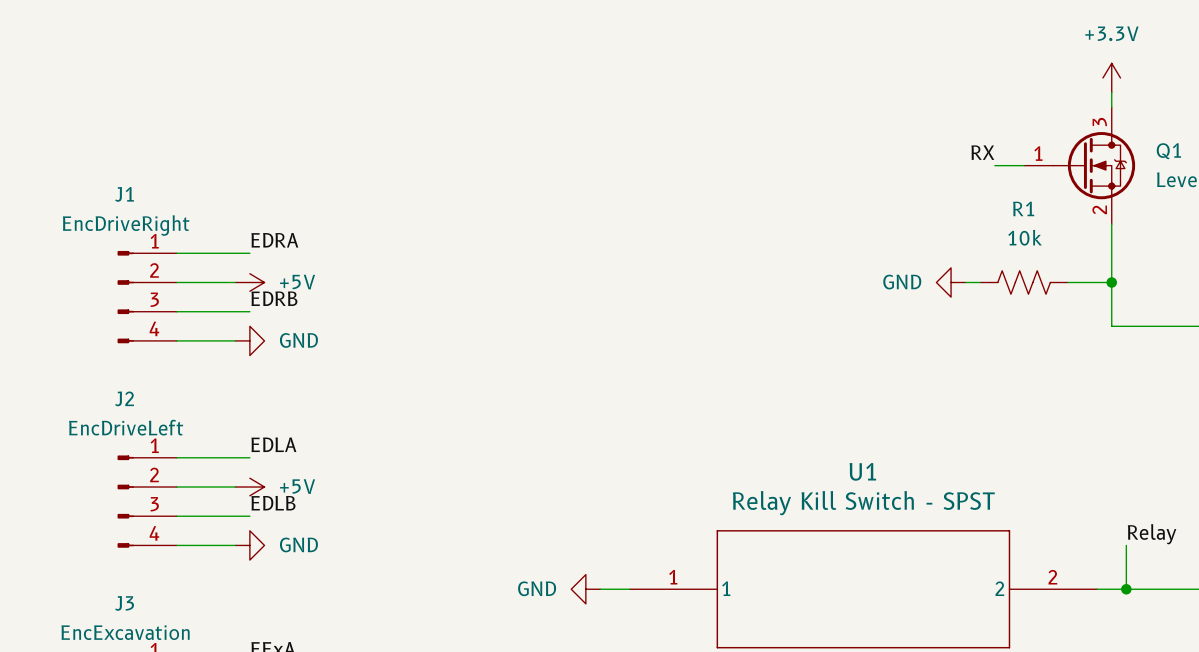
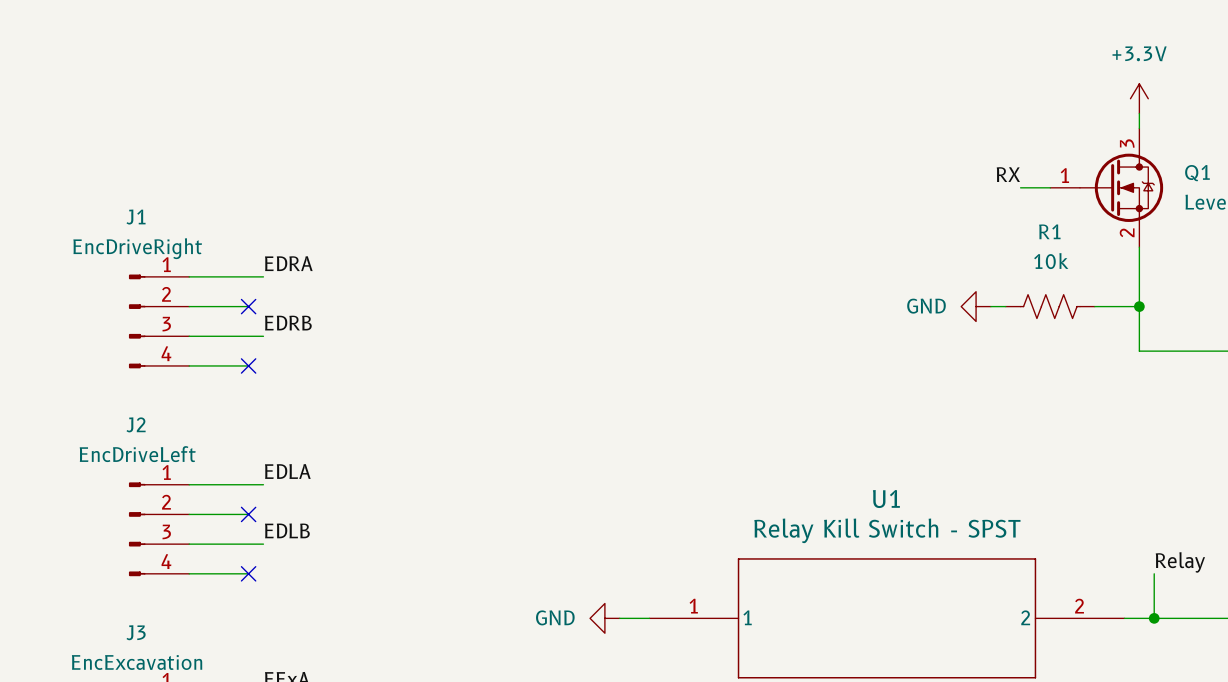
no-connect mark: none -> (248, 306)
power symbol: +5V (249, 282) -> none
no-connect mark: none -> (248, 365)
power symbol: GND (249, 340) -> none
no-connect mark: none -> (248, 514)
power symbol: +5V (249, 487) -> none
no-connect mark: none -> (248, 573)
power symbol: GND (249, 545) -> none

